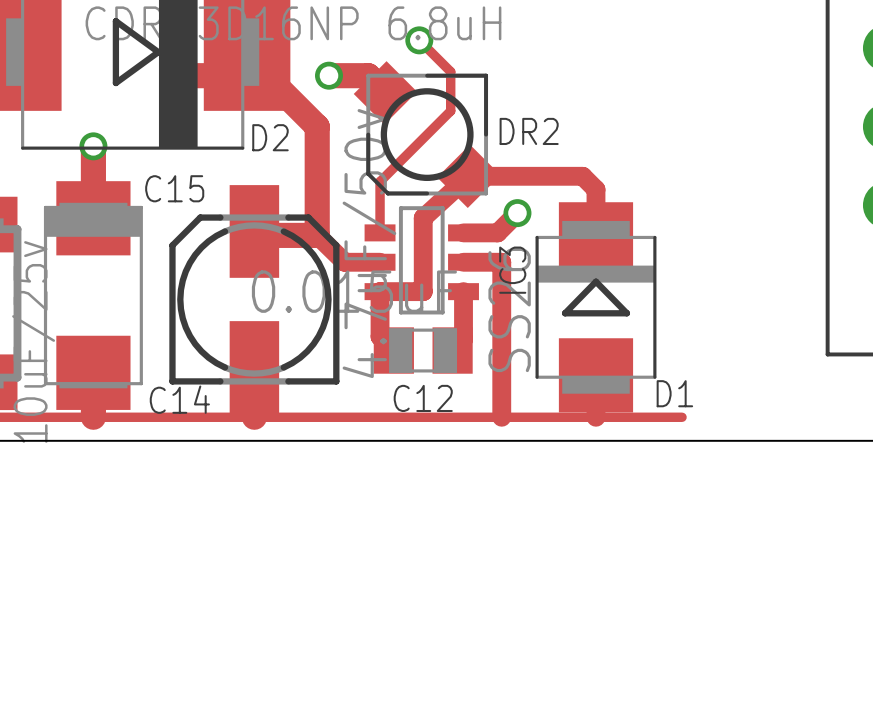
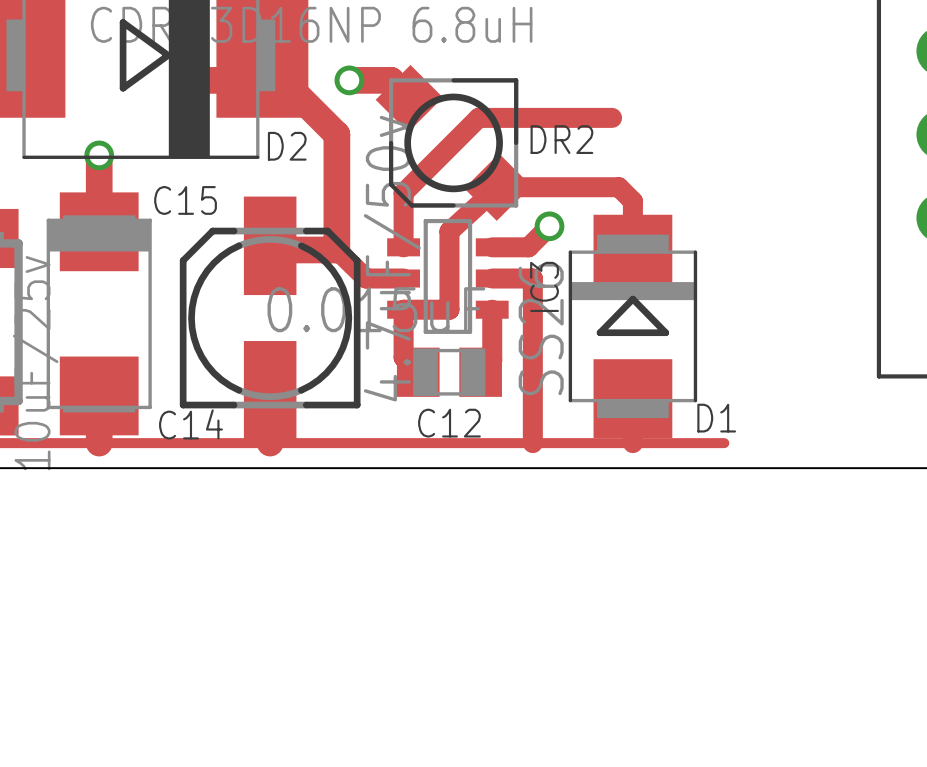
track: (419, 40) (450, 71) (450, 111) -> (612, 117) (478, 117)
via: (419, 40) -> none
track width: thin (450, 111) (380, 181) (380, 232) -> thick (478, 117) (403, 192) (403, 247)

